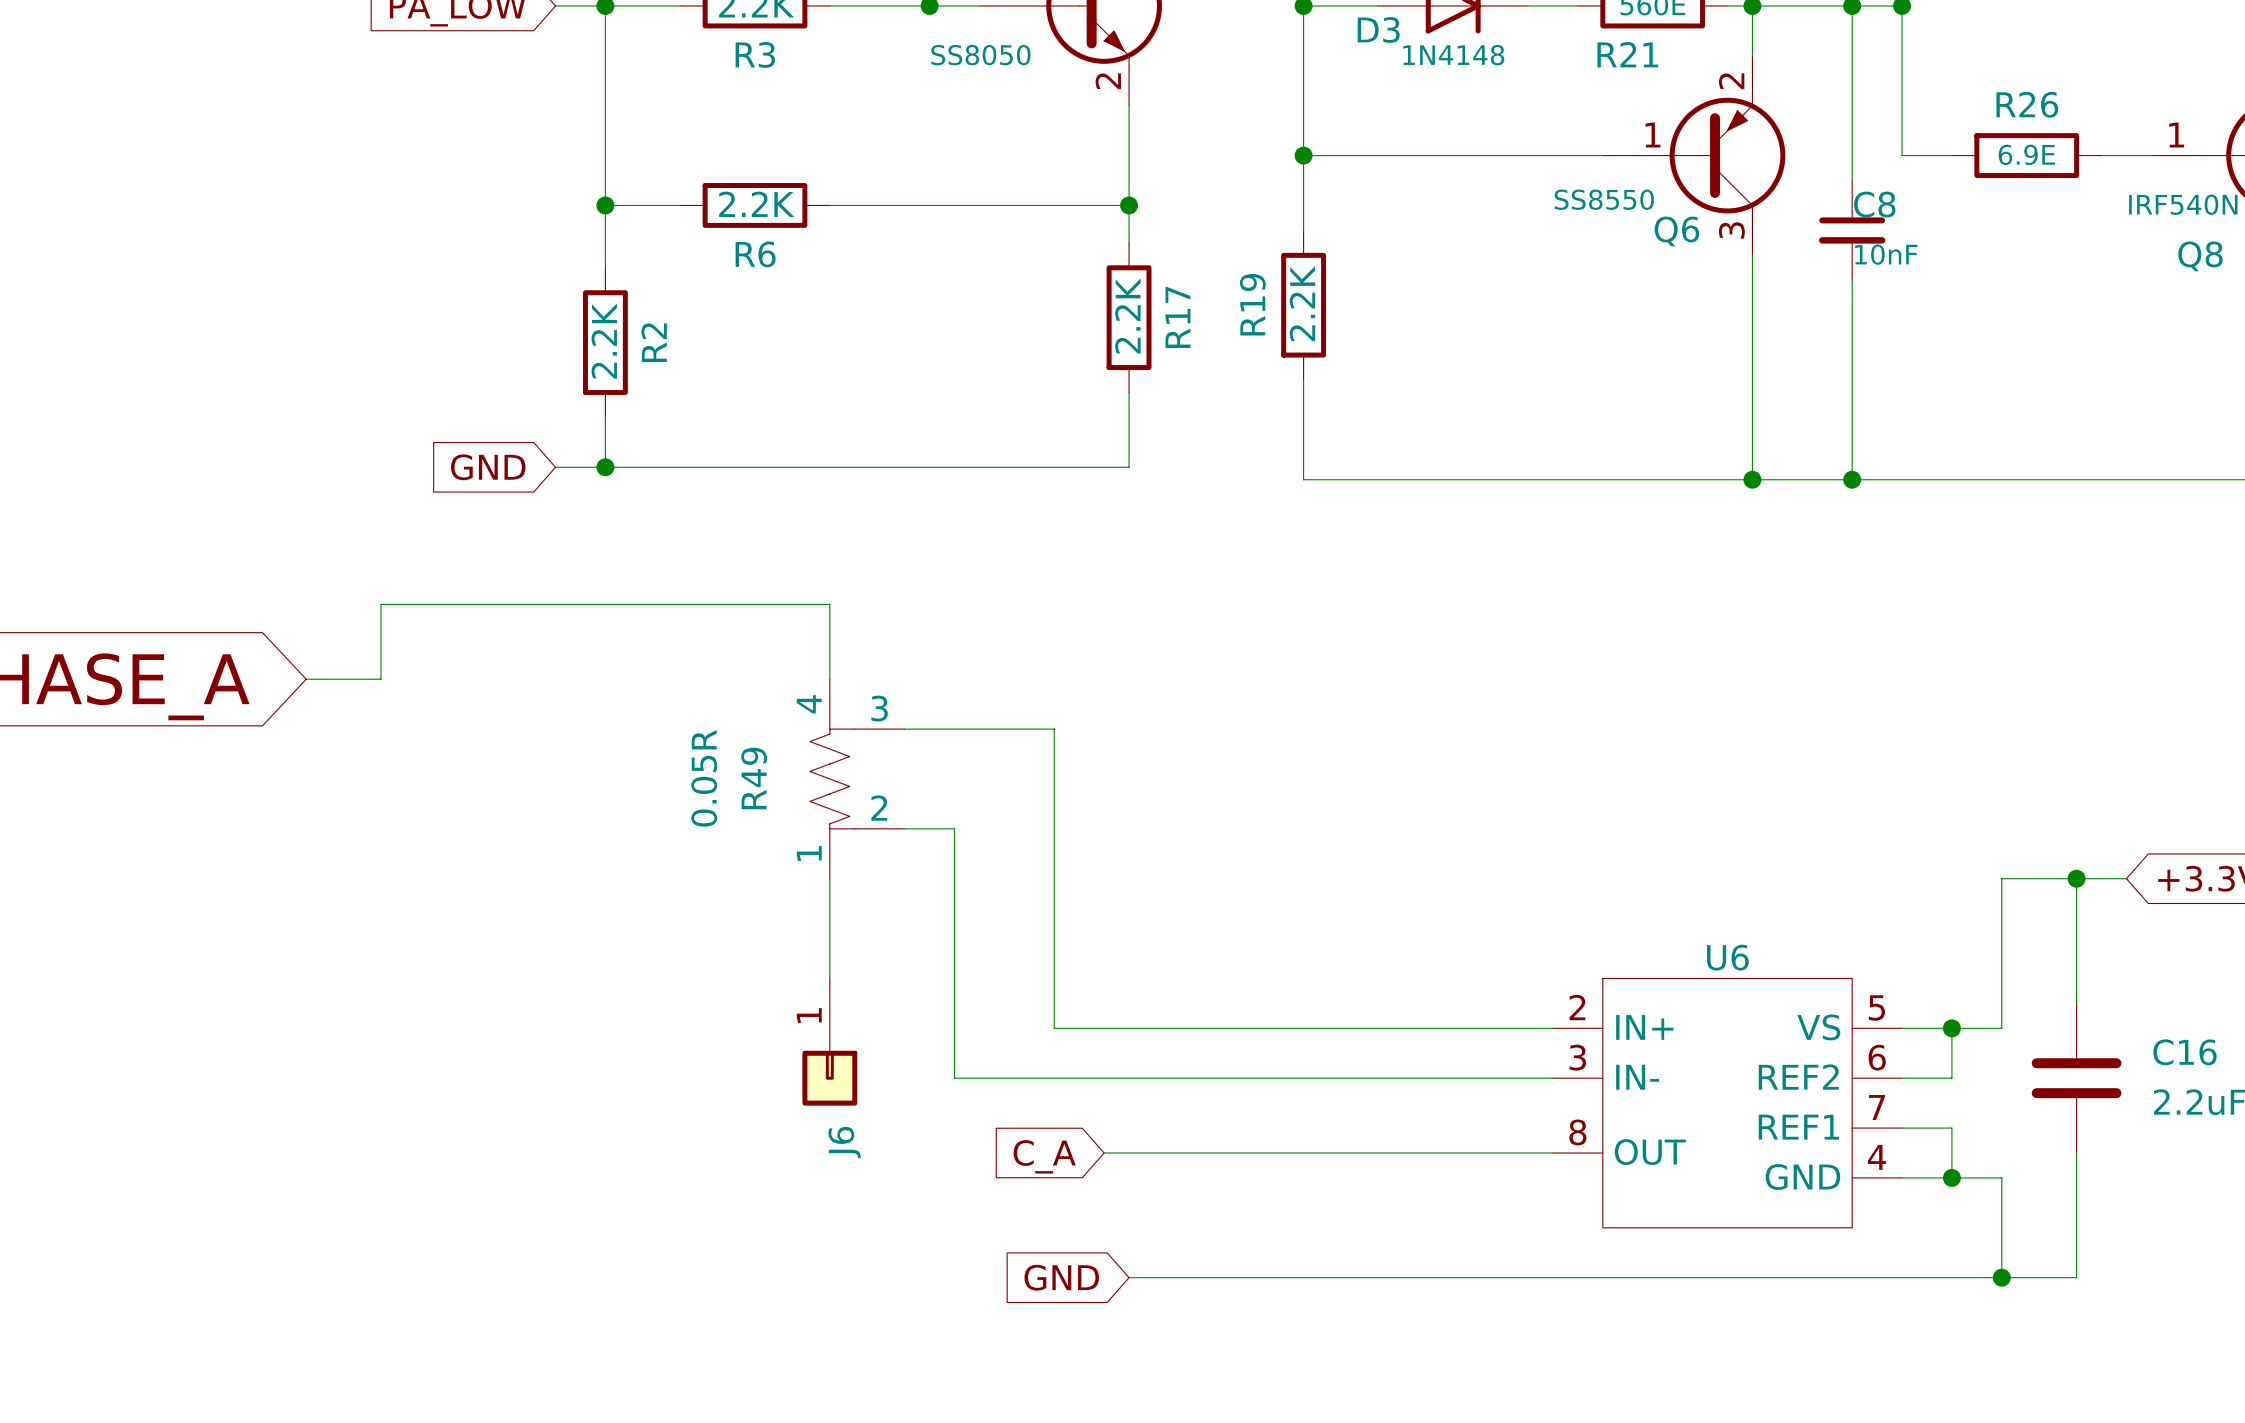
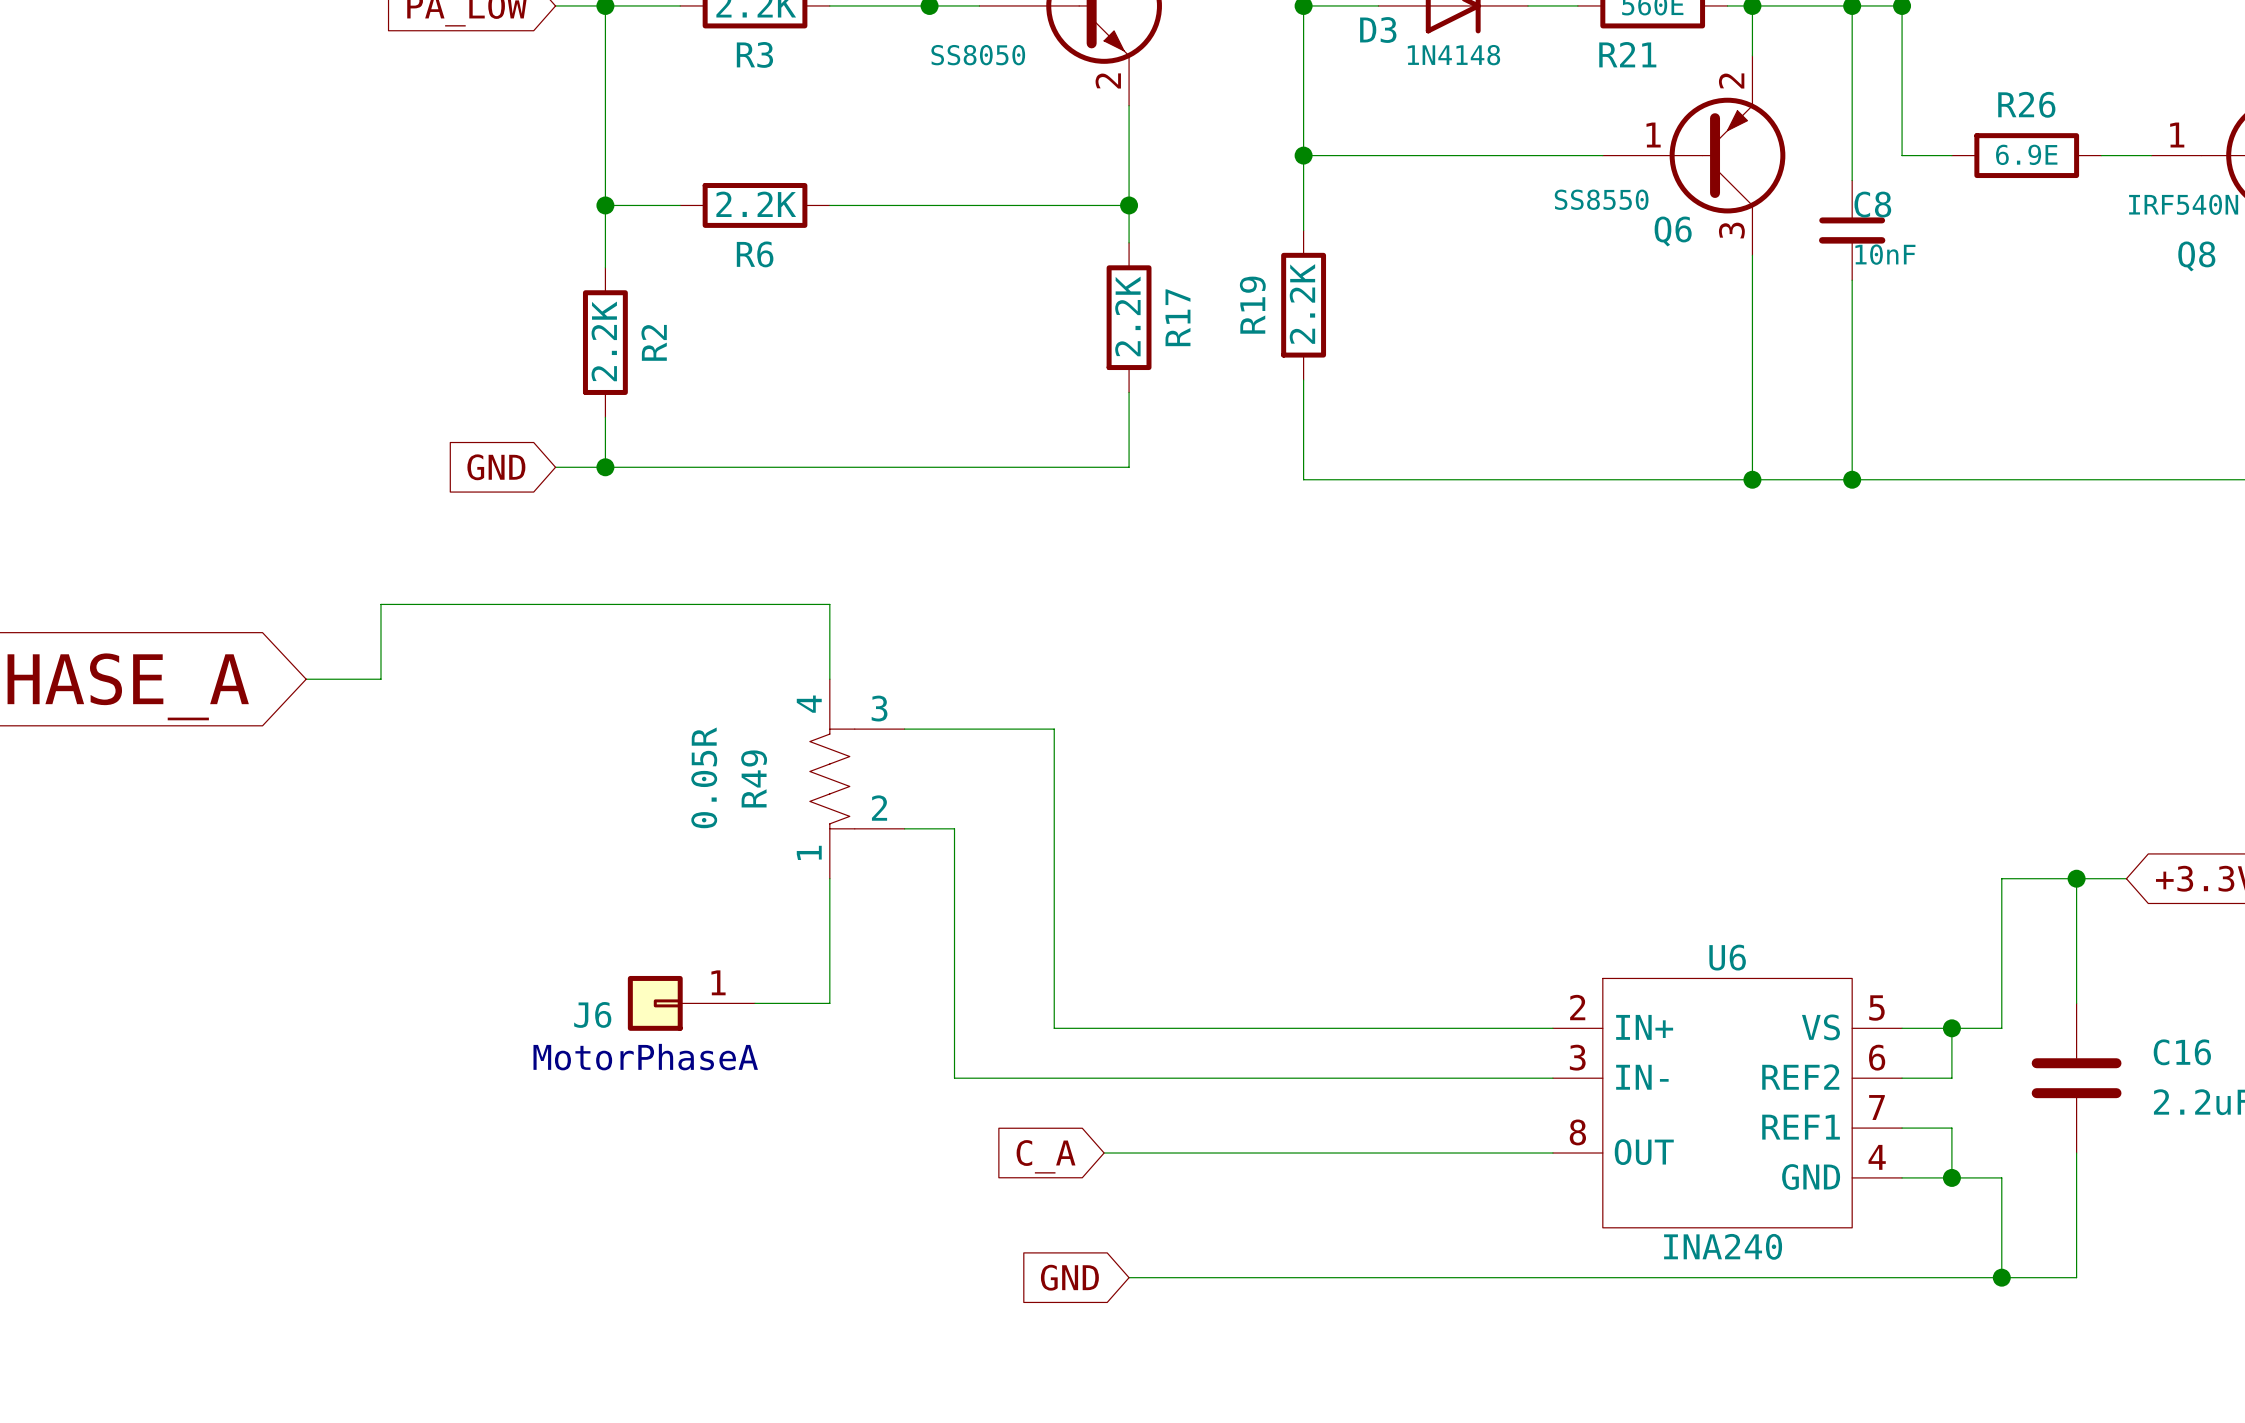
wire: none -> (829, 978) (829, 1003) (755, 1003)
J6 position: (829, 1042) -> (691, 1003)
text: none -> MotorPhaseA (645, 1057)
J6 rotation: 0° (829, 1078) -> 90° clockwise (655, 1003)
U6 value: none -> INA240 (1723, 1246)

